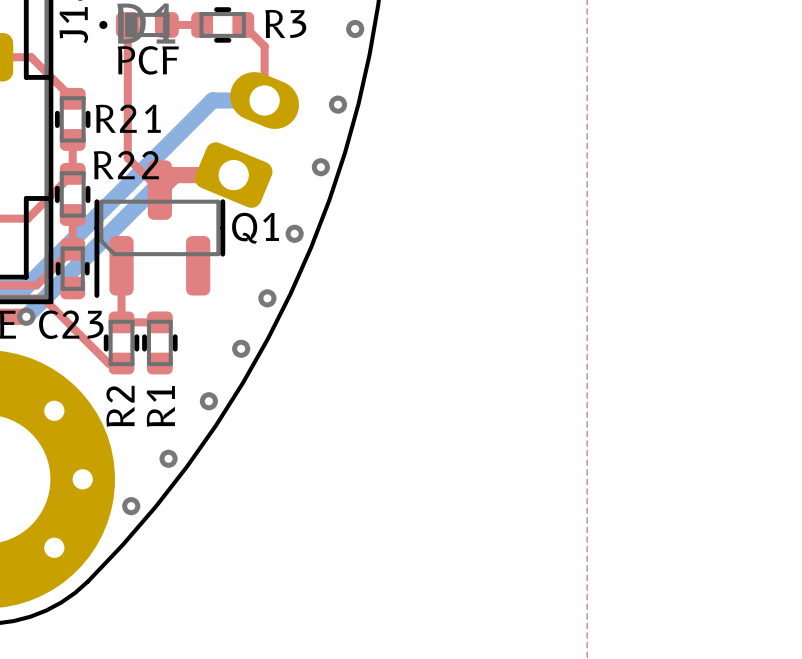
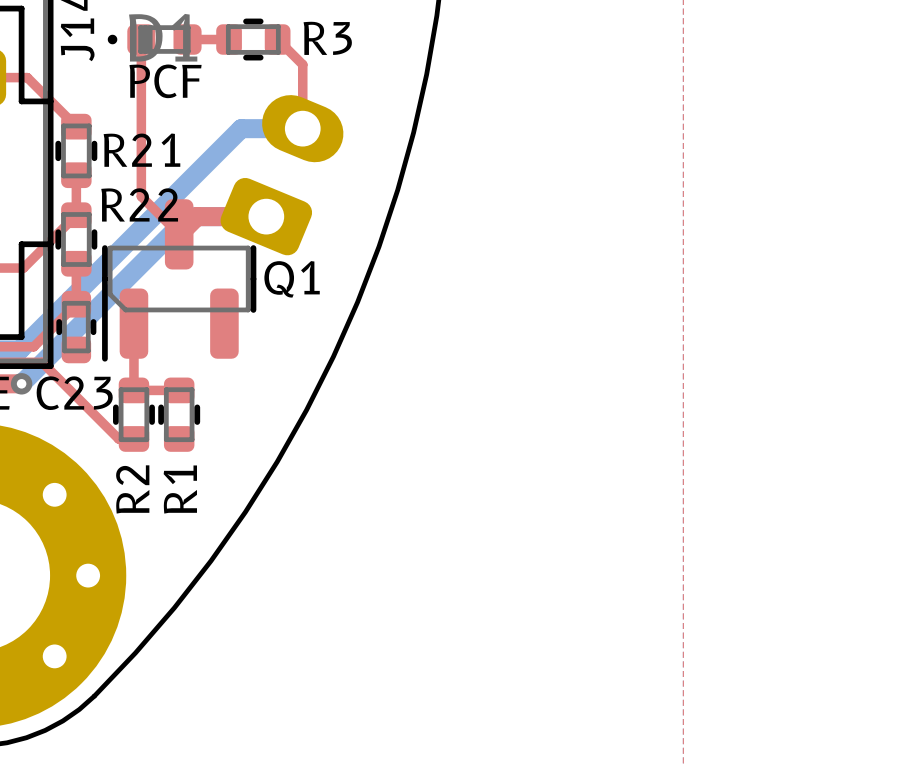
via: (355, 28) -> none
via: (338, 104) -> none
via: (320, 167) -> none
via: (294, 233) -> none
via: (267, 298) -> none
via: (241, 348) -> none
via: (208, 401) -> none
via: (168, 458) -> none
via: (131, 506) -> none

